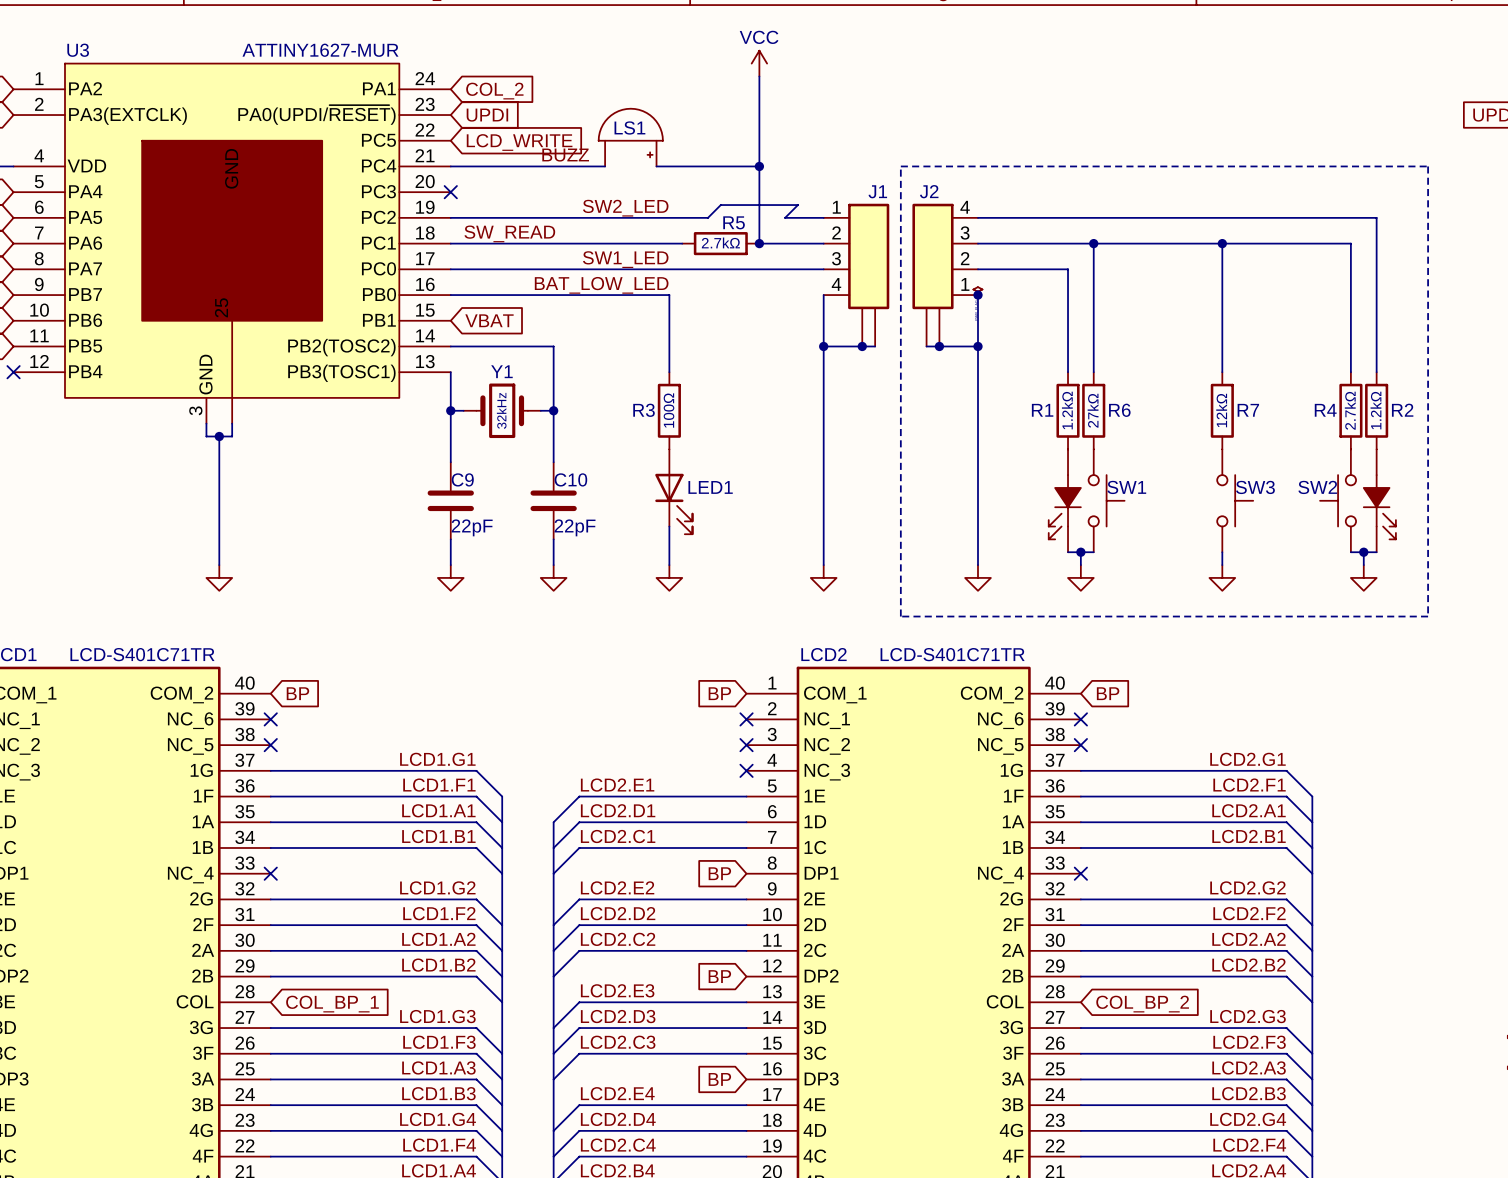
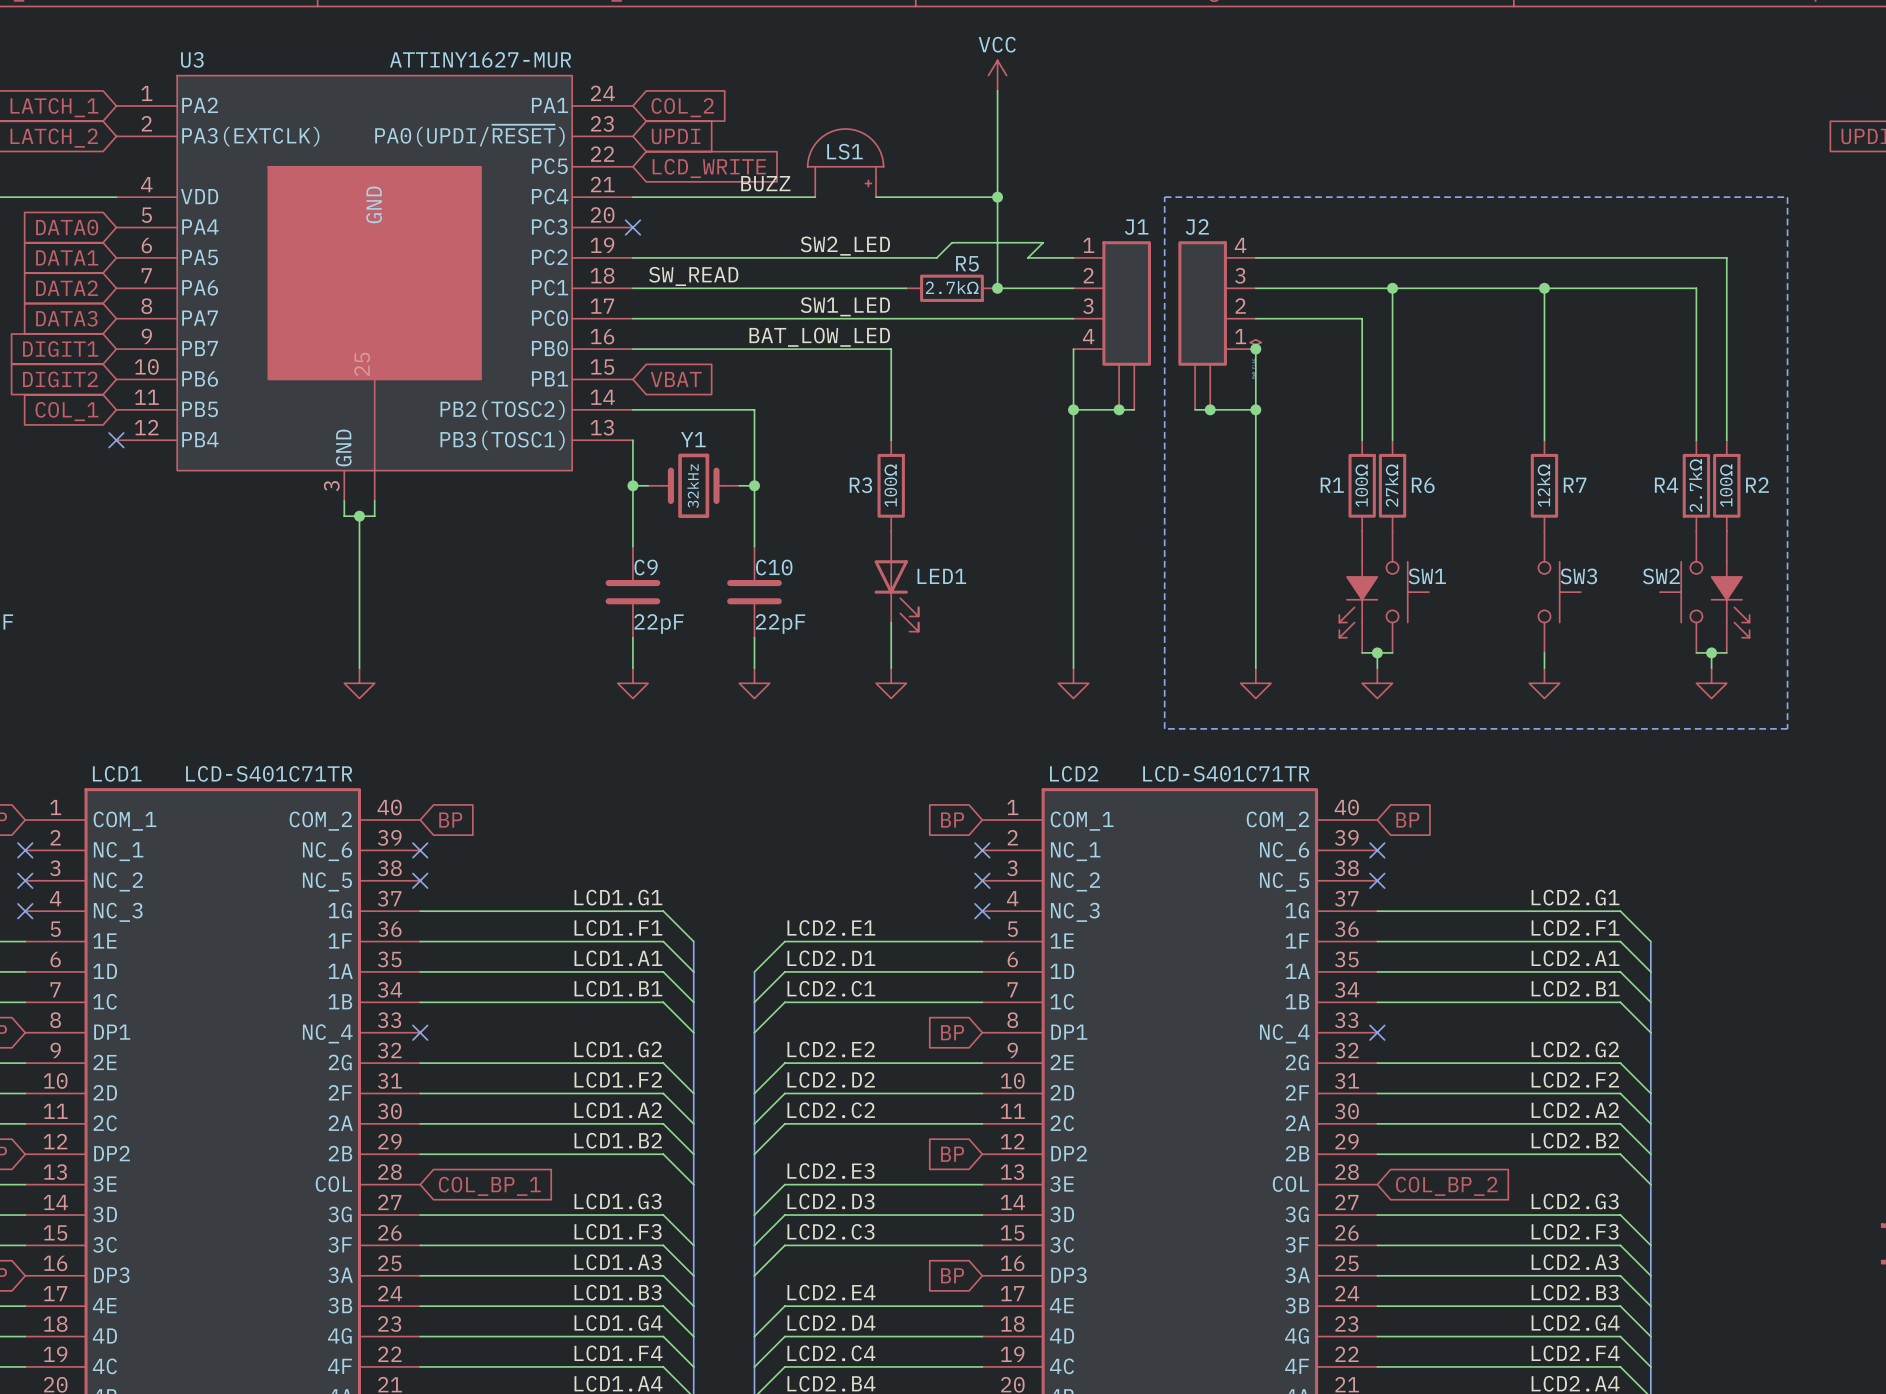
R1 value: 1.2kΩ (1067, 410) -> 100Ω (1361, 485)
R2 value: 1.2kΩ (1375, 410) -> 100Ω (1726, 485)

